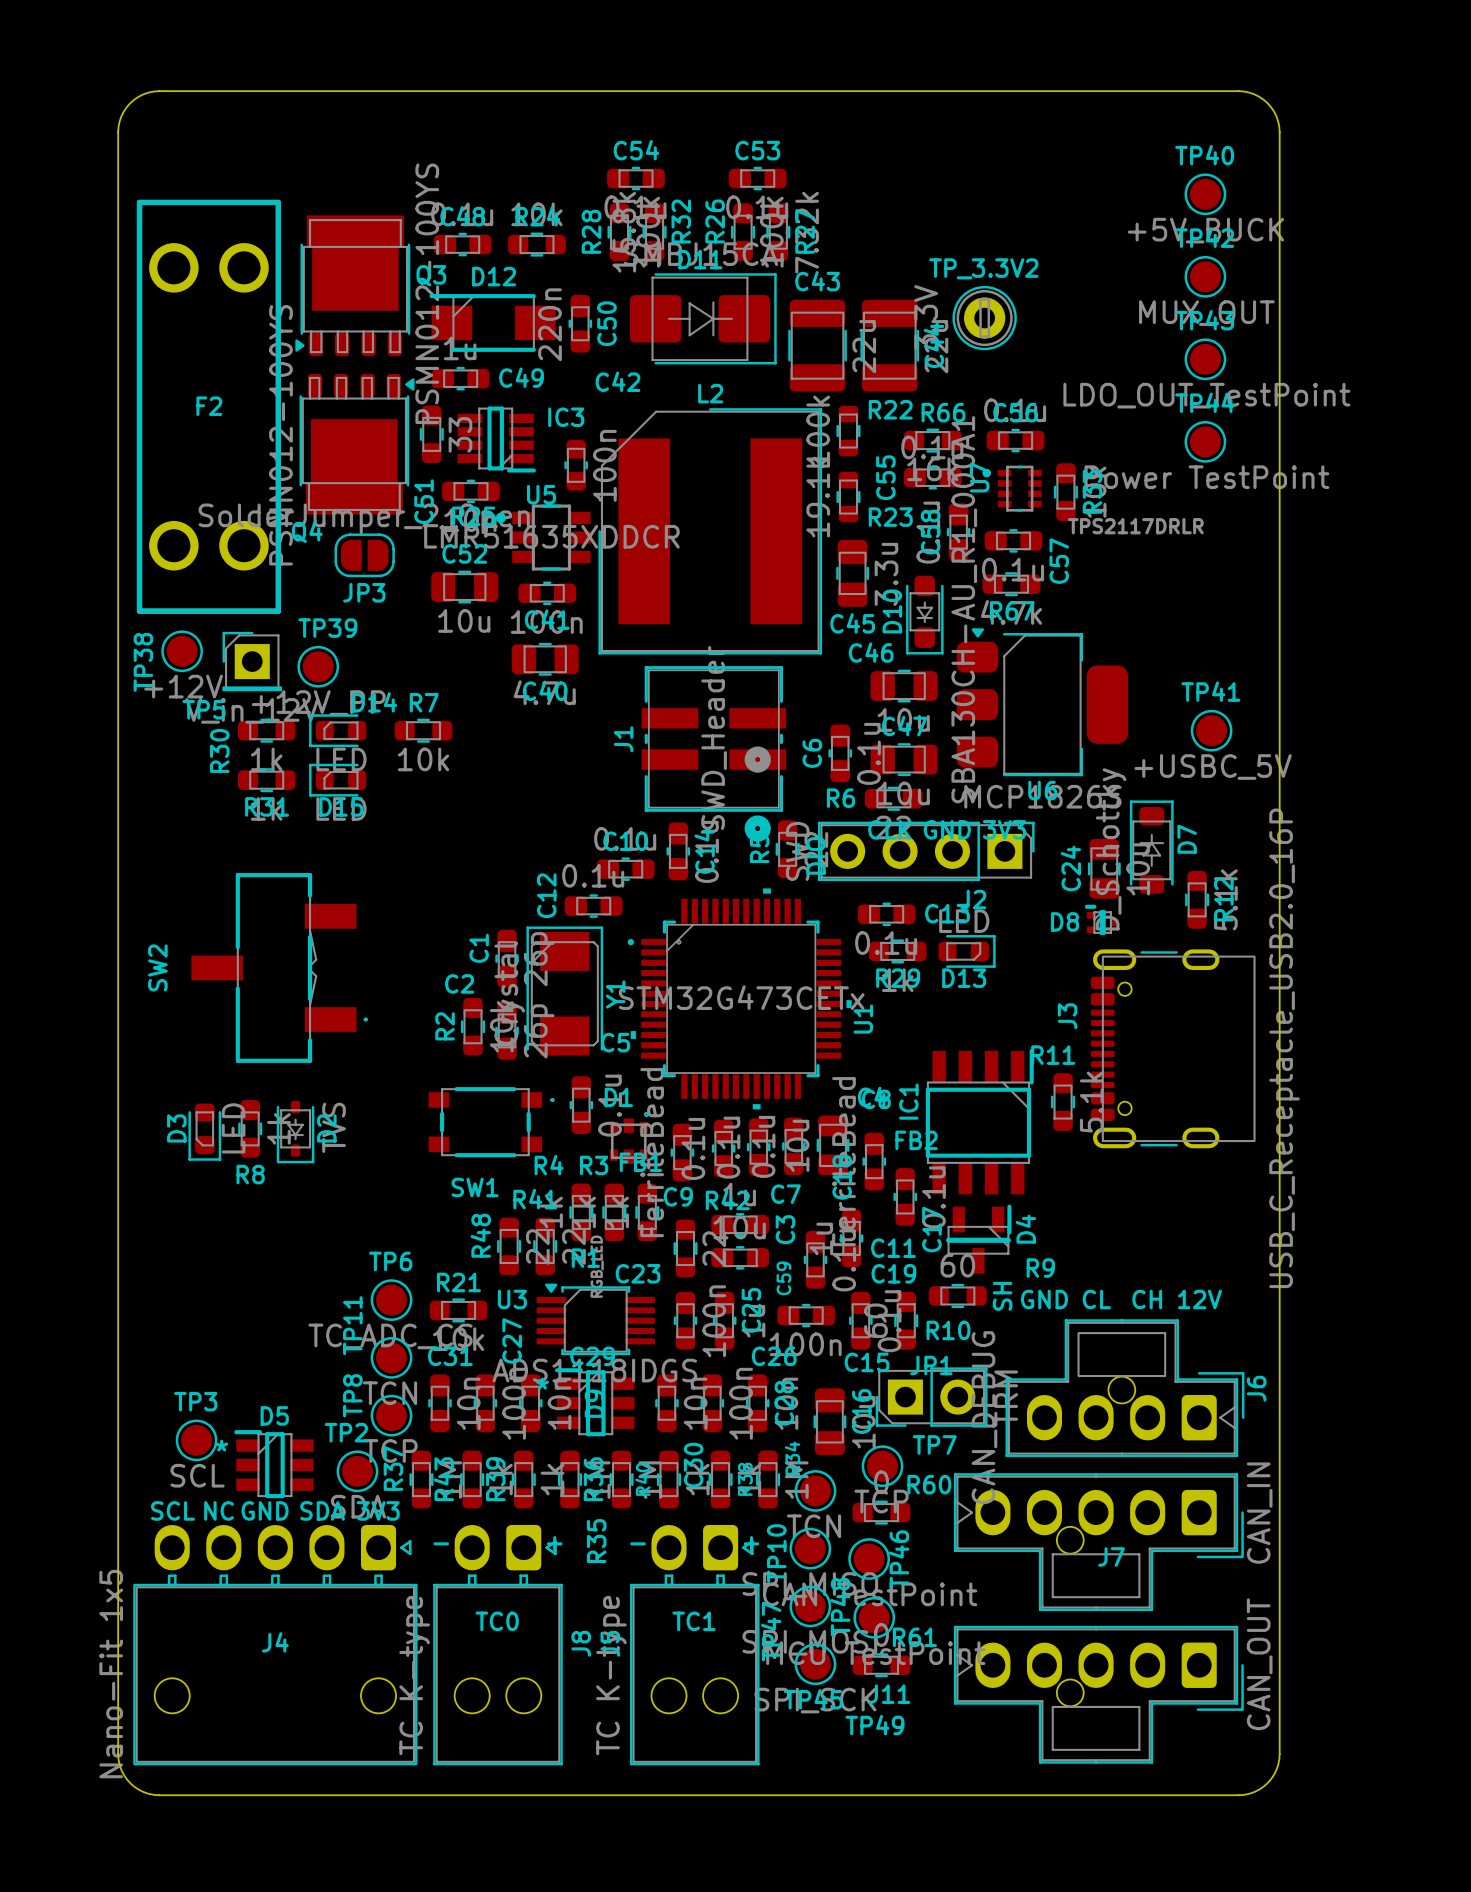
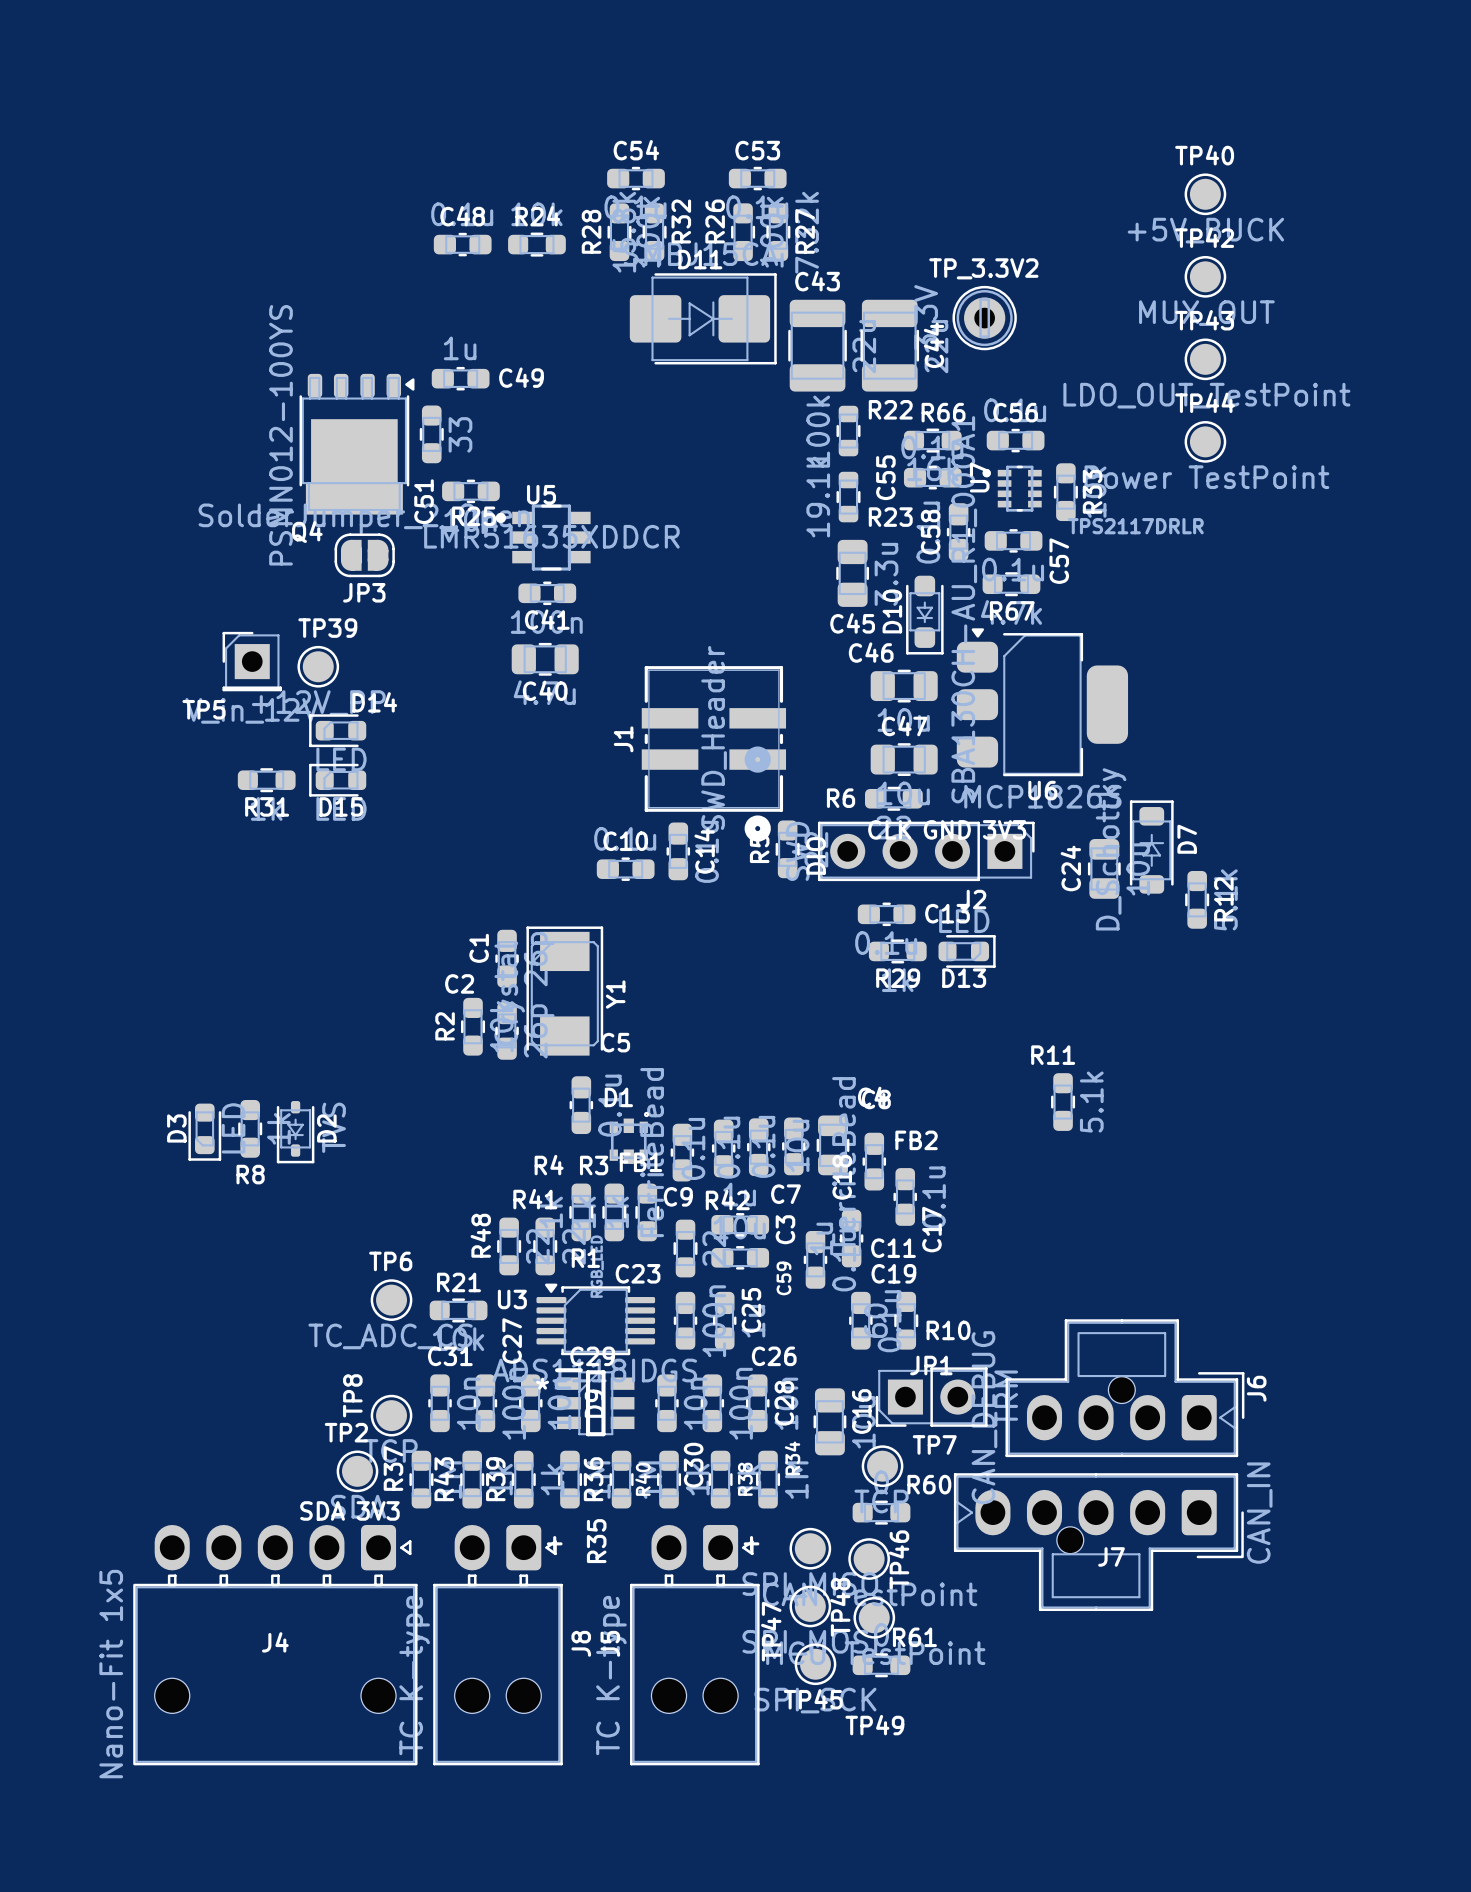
board edge: (159, 91) (1238, 91) (1259, 96) (1274, 111) (1279, 132) (1279, 1753) (1274, 1774) (1259, 1789) (1238, 1795) (159, 1795) (138, 1789) (123, 1774) (118, 1753) (118, 132) (121, 116) (130, 103) (143, 94) (159, 91) -> none
Q3: PSMN012-100YS (352, 285) -> none
D12: (492, 322) -> none
C50: 220n (580, 323) -> none
F2: (208, 406) -> none
IC3: (496, 439) -> none
C42: 100n (576, 465) -> none
L2: (710, 531) -> none
C52: 10u (464, 587) -> none
TP38: +12V (182, 651) -> none
R30: 1k (266, 730) -> none
R7: 10k (423, 730) -> none
TP41: +USBC_5V (1211, 730) -> none
C6: 0.1u (840, 753) -> none
C12: 0.1u (593, 906) -> none
D8: (1101, 919) -> none
SW2: (279, 967) -> none
U1: STM32G473CETx (739, 998) -> none
J3: USB_C_Receptacle_USB2.0_16P (1173, 1048) -> none
IC1: (979, 1121) -> none
SW1: (491, 1122) -> none
D4: (978, 1239) -> none
R9: 60 (957, 1295) -> none
text: SH (1002, 1296) -> none
text: GND (1044, 1299) -> none
text: CL (1096, 1299) -> none
text: CH (1147, 1299) -> none
text: 12V (1200, 1299) -> none
C15: 100n (806, 1315) -> none
TP11: TCN (391, 1357) -> none
TP3: SCL (196, 1440) -> none
D5: (273, 1464) -> none
TP10: TCN (815, 1490) -> none
text: SCL (173, 1510) -> none
text: NC (219, 1510) -> none
text: GND (265, 1510) -> none
text: - (441, 1543) -> none
text: - (638, 1543) -> none
text: TC0 (497, 1621) -> none
text: TC1 (694, 1621) -> none
J11: CAN_OUT (1098, 1694) -> none

